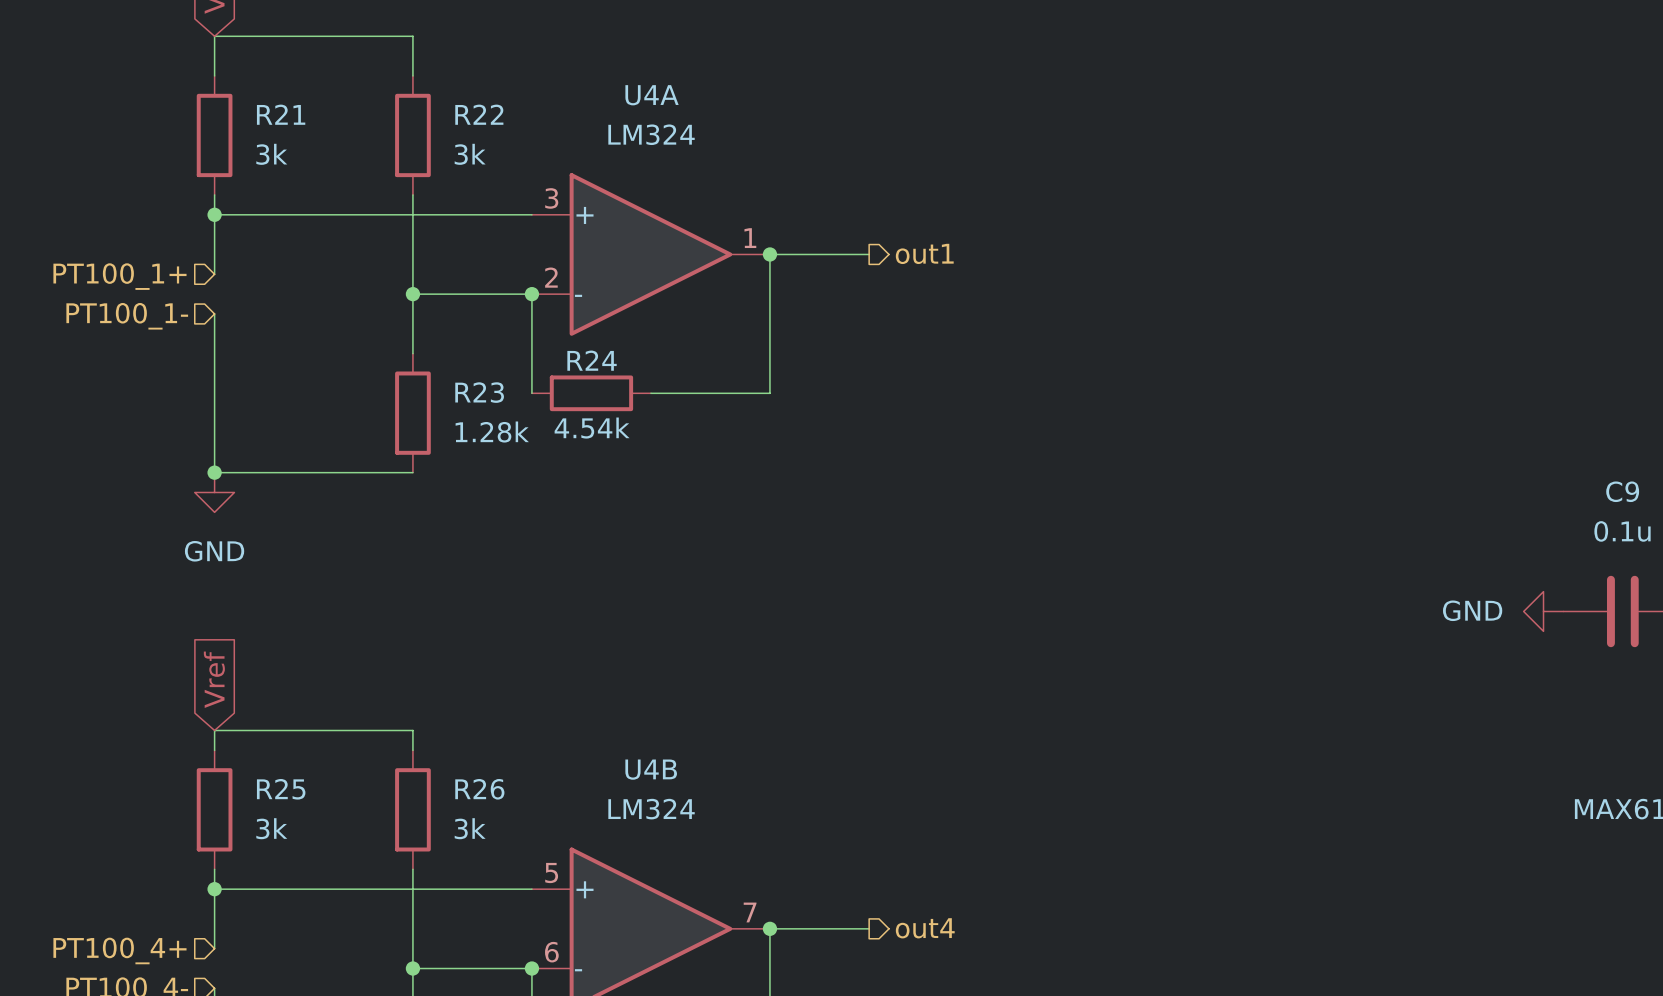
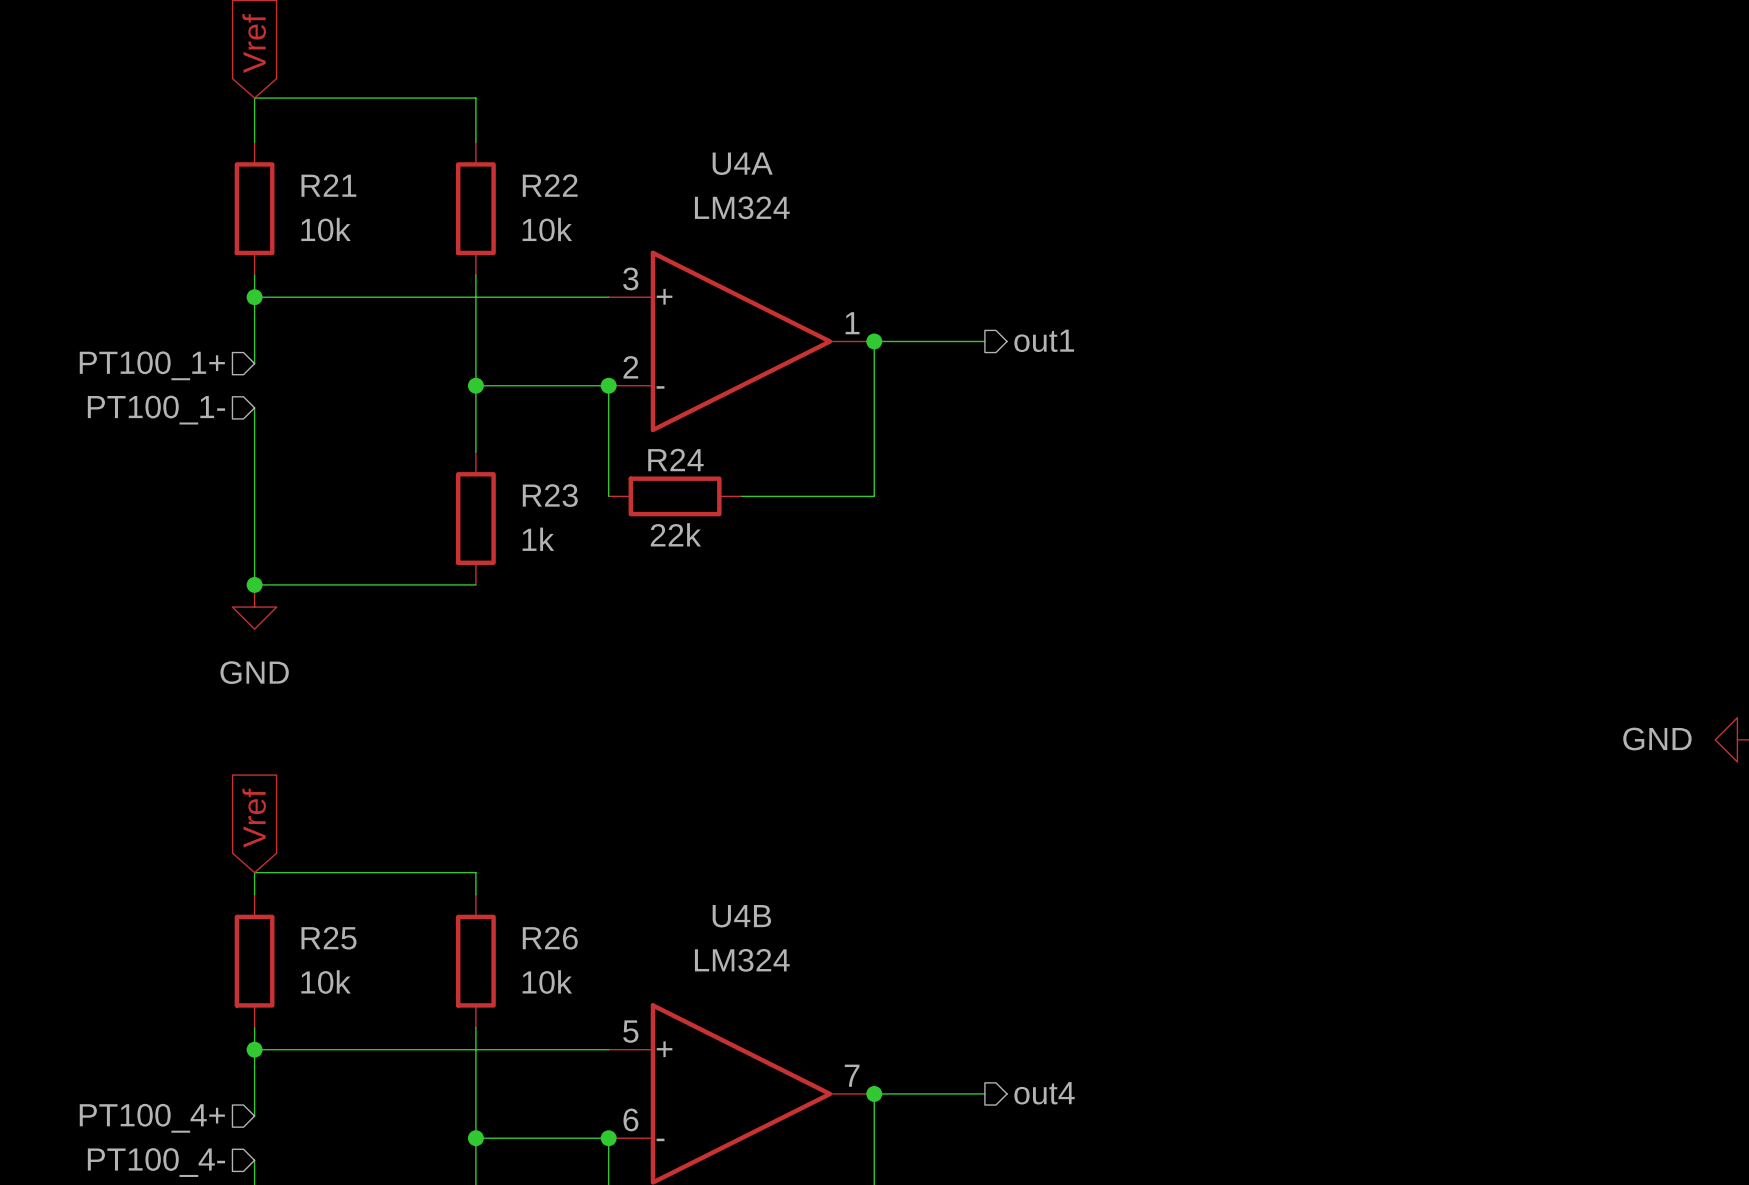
R21 value: 3k (271, 154) -> 10k (326, 229)
R22 value: 3k (470, 154) -> 10k (547, 229)
R24 value: 4.54k (592, 428) -> 22k (675, 534)
R23 value: 1.28k (492, 432) -> 1k (538, 539)
R25 value: 3k (271, 828) -> 10k (326, 982)
R26 value: 3k (470, 828) -> 10k (547, 982)

